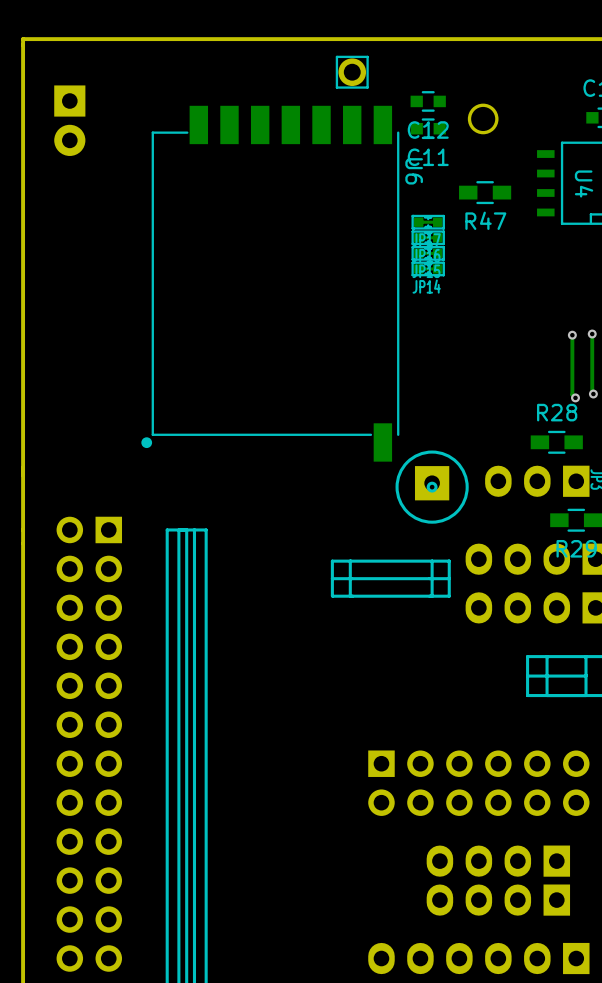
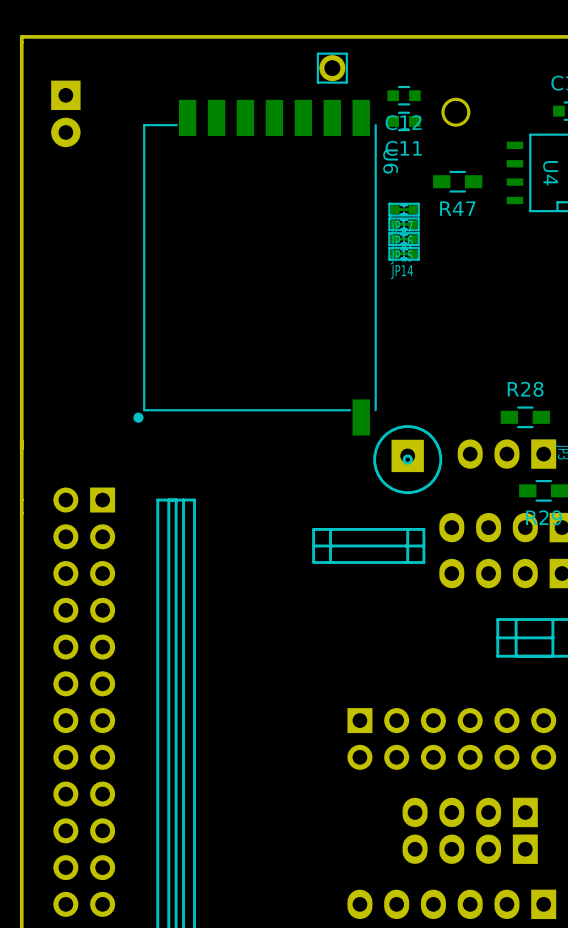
track: (592, 334) (593, 394) -> none
via: (592, 334) -> none
track: (572, 335) (572, 394) (575, 397) -> none
via: (572, 335) -> none
via: (593, 394) -> none
via: (575, 397) -> none

